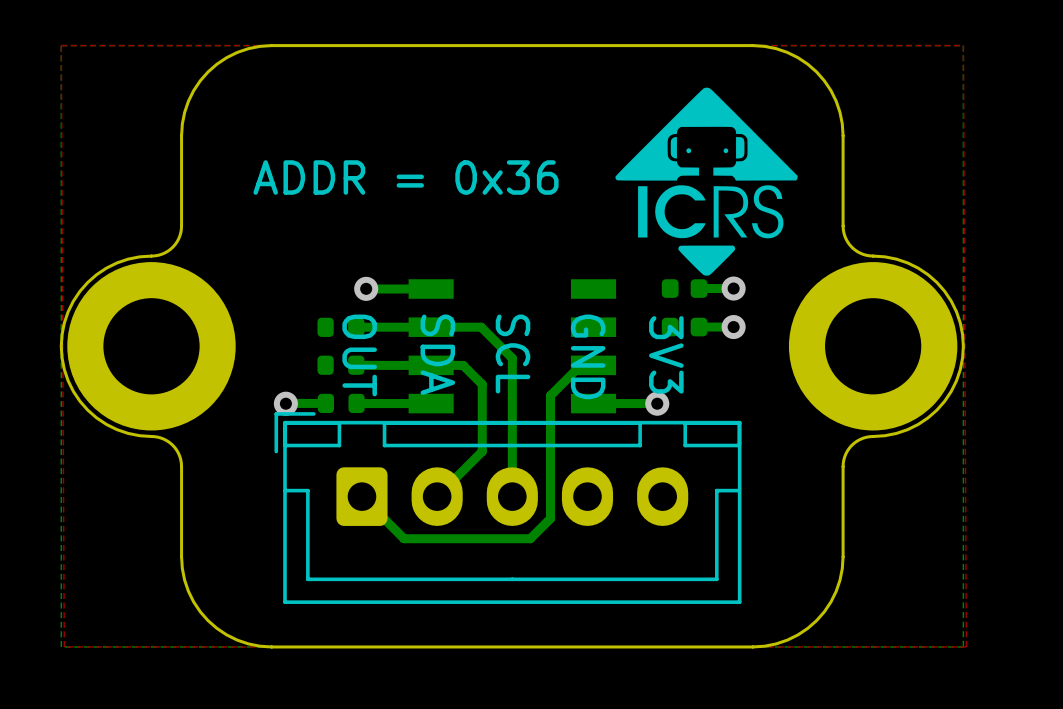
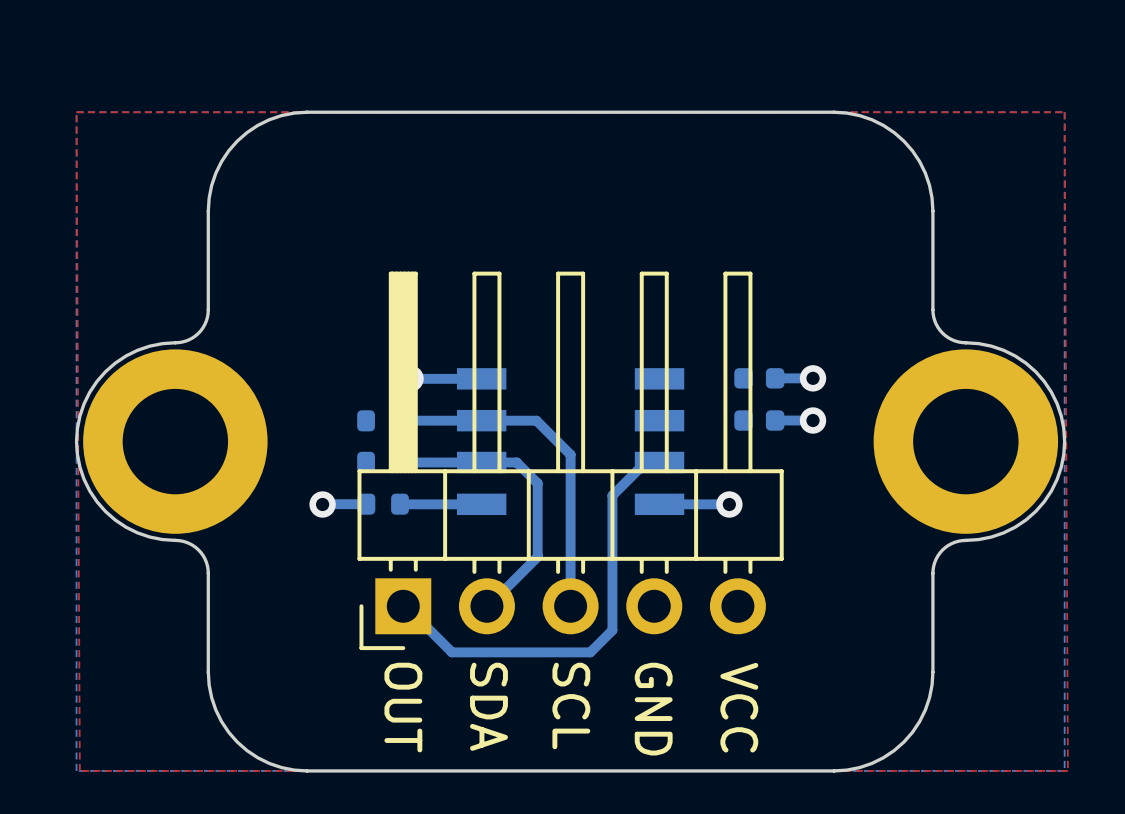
drawing: [615, 87, 798, 276] -> none
text: ADDR = 0x36 (405, 177) -> none
text position: SDA (437, 354) -> SDA (489, 706)
text position: SCL (512, 354) -> SCL (571, 705)
text: 3V3 (666, 354) -> none
text position: OUT (359, 355) -> OUT (403, 707)
text position: GND (588, 356) -> GND (653, 709)
part: none -> (570, 460)
part: (507, 508) -> none
text: none -> VCC (739, 707)

